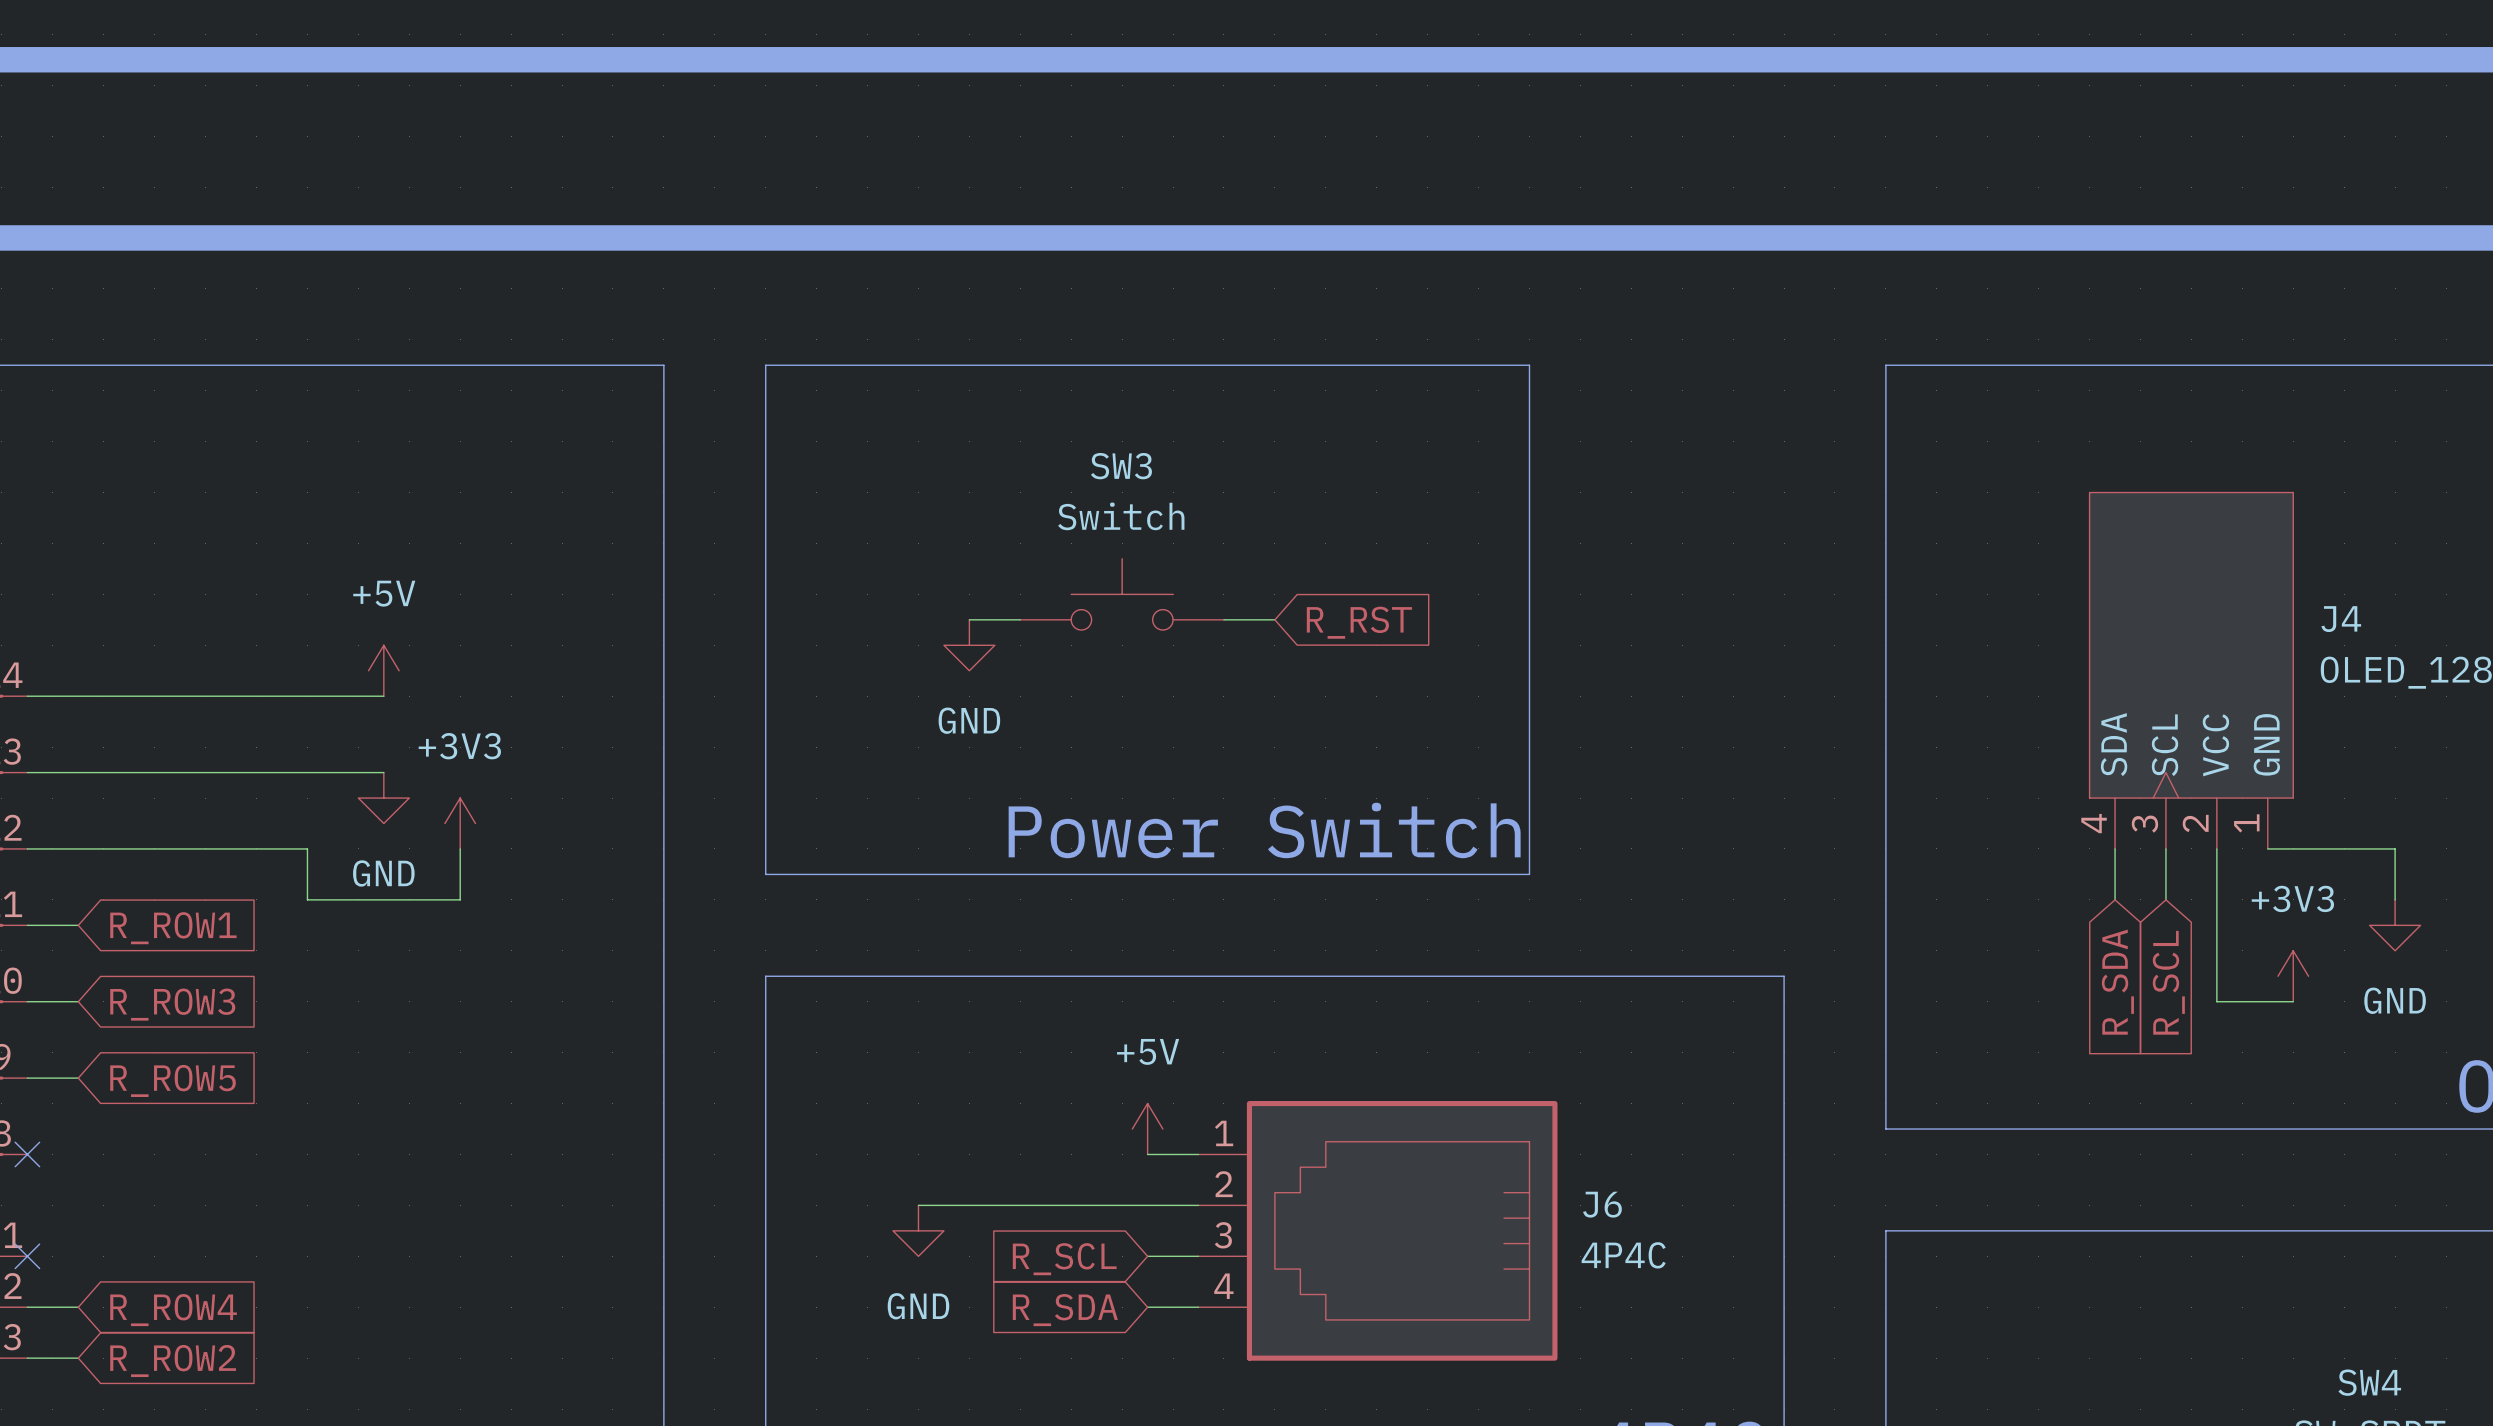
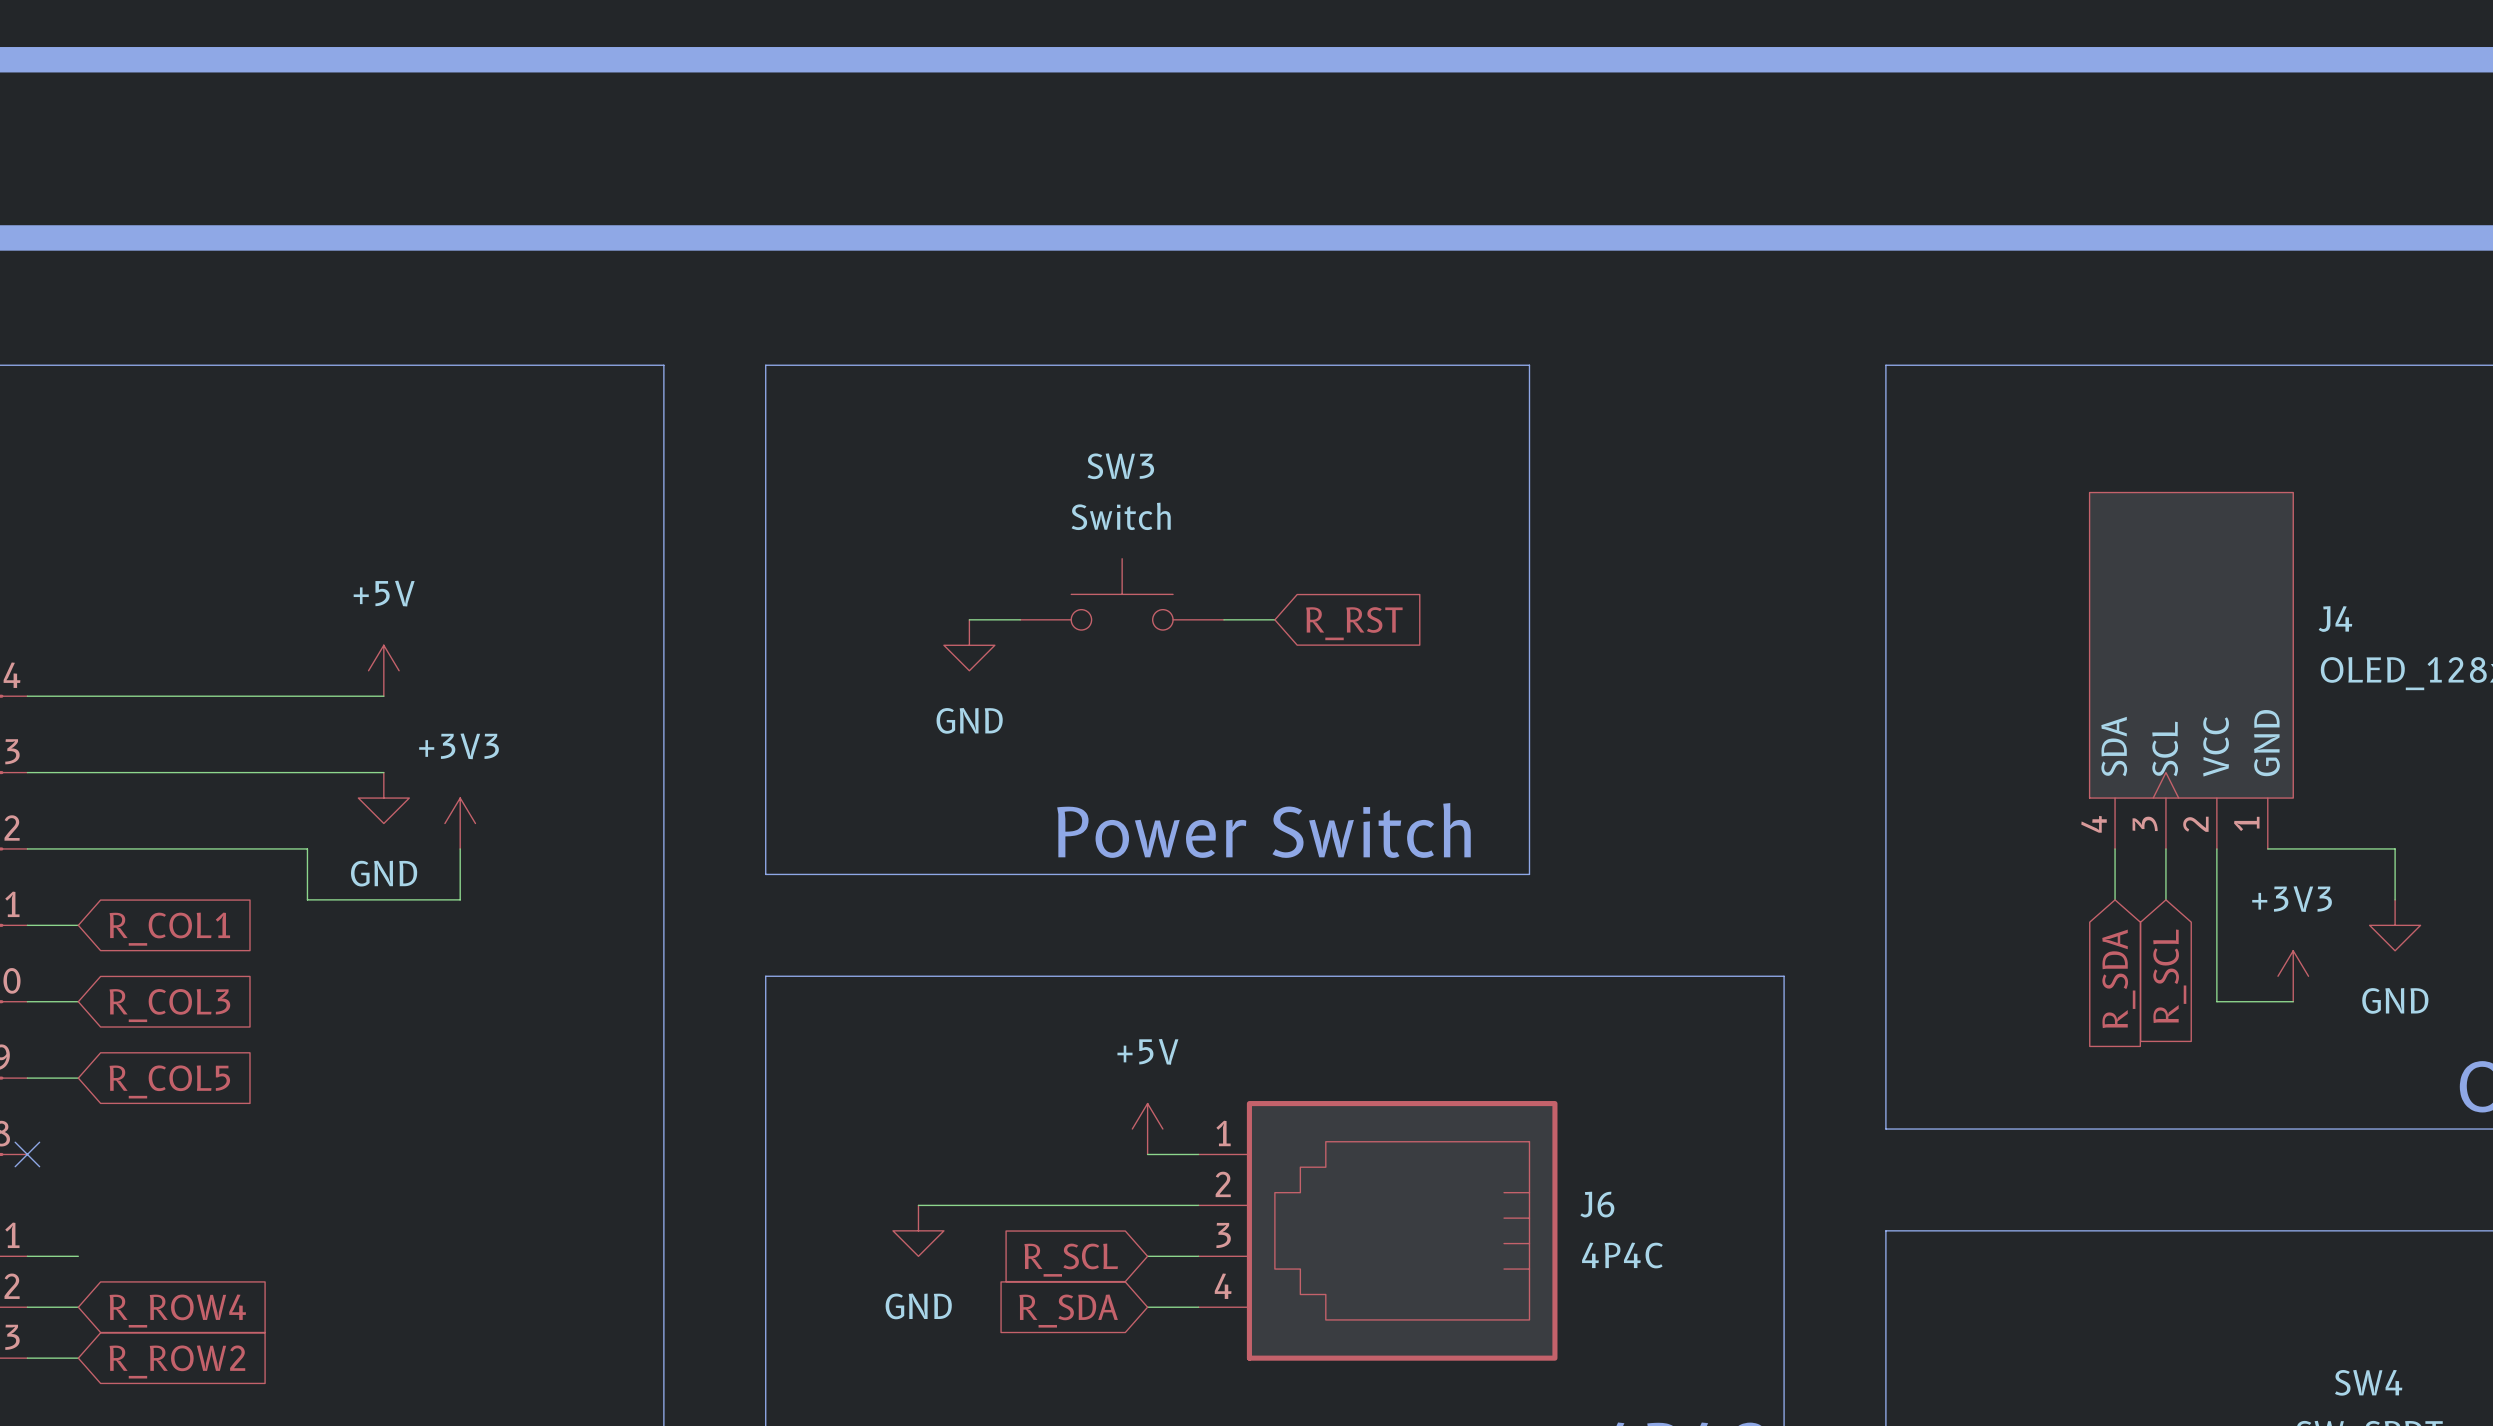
global label: R_ROW1 (173, 928) -> R_COL1 (169, 929)
global label: R_ROW3 (172, 1004) -> R_COL3 (169, 1005)
global label: R_ROW5 (173, 1080) -> R_COL5 (169, 1081)
wire: none -> (27, 1256) (78, 1256)
no-connect mark: (27, 1256) -> none

